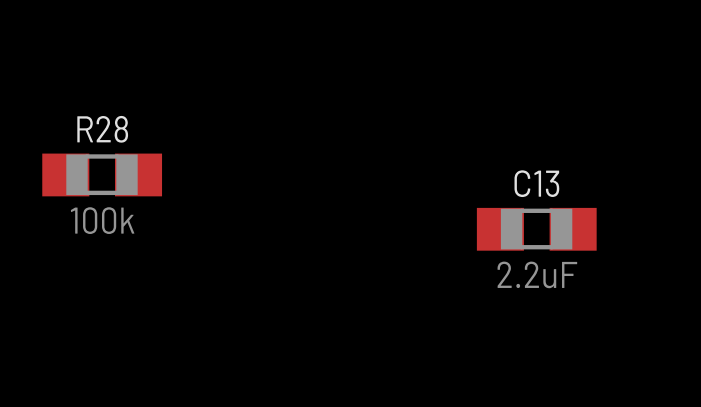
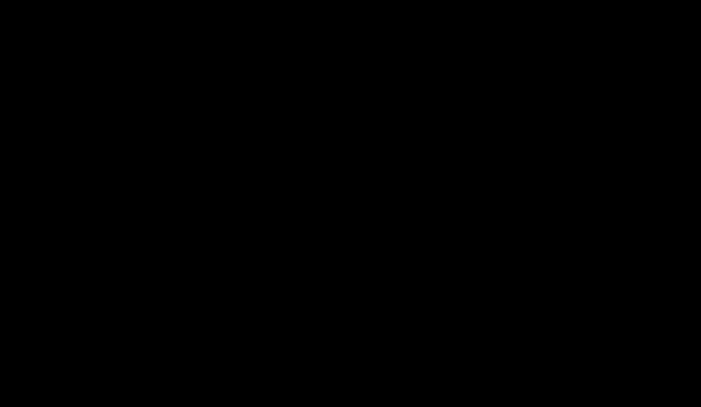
R28: 100k (102, 174) -> none
C13: 2.2uF (536, 229) -> none

